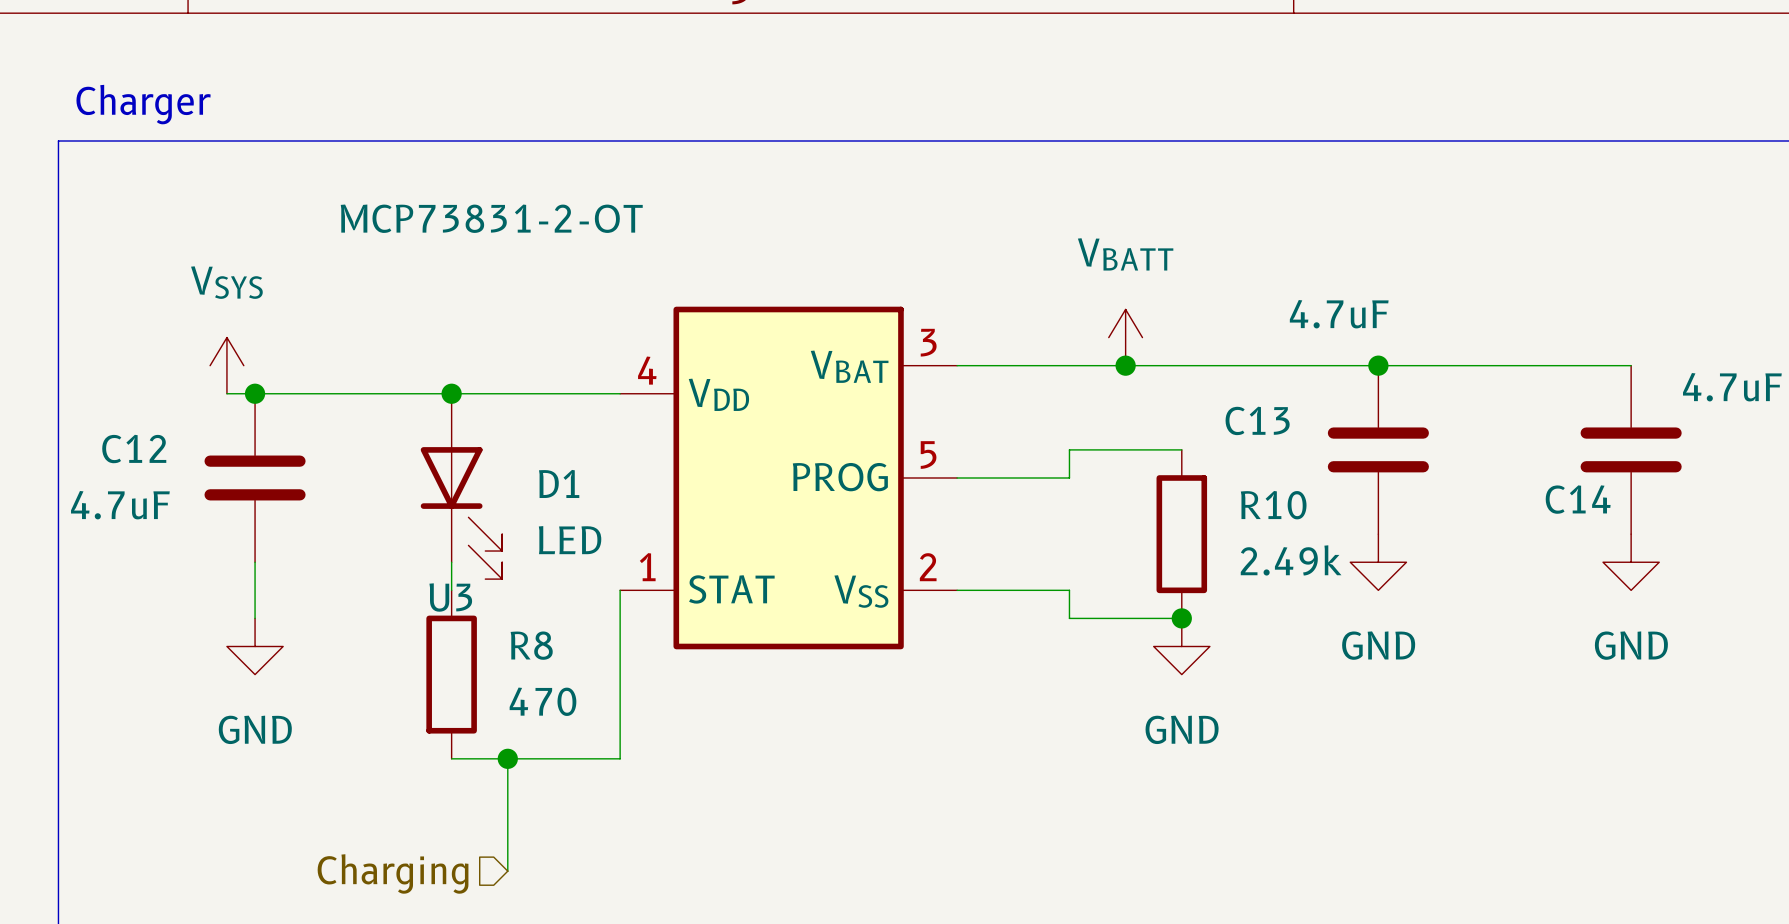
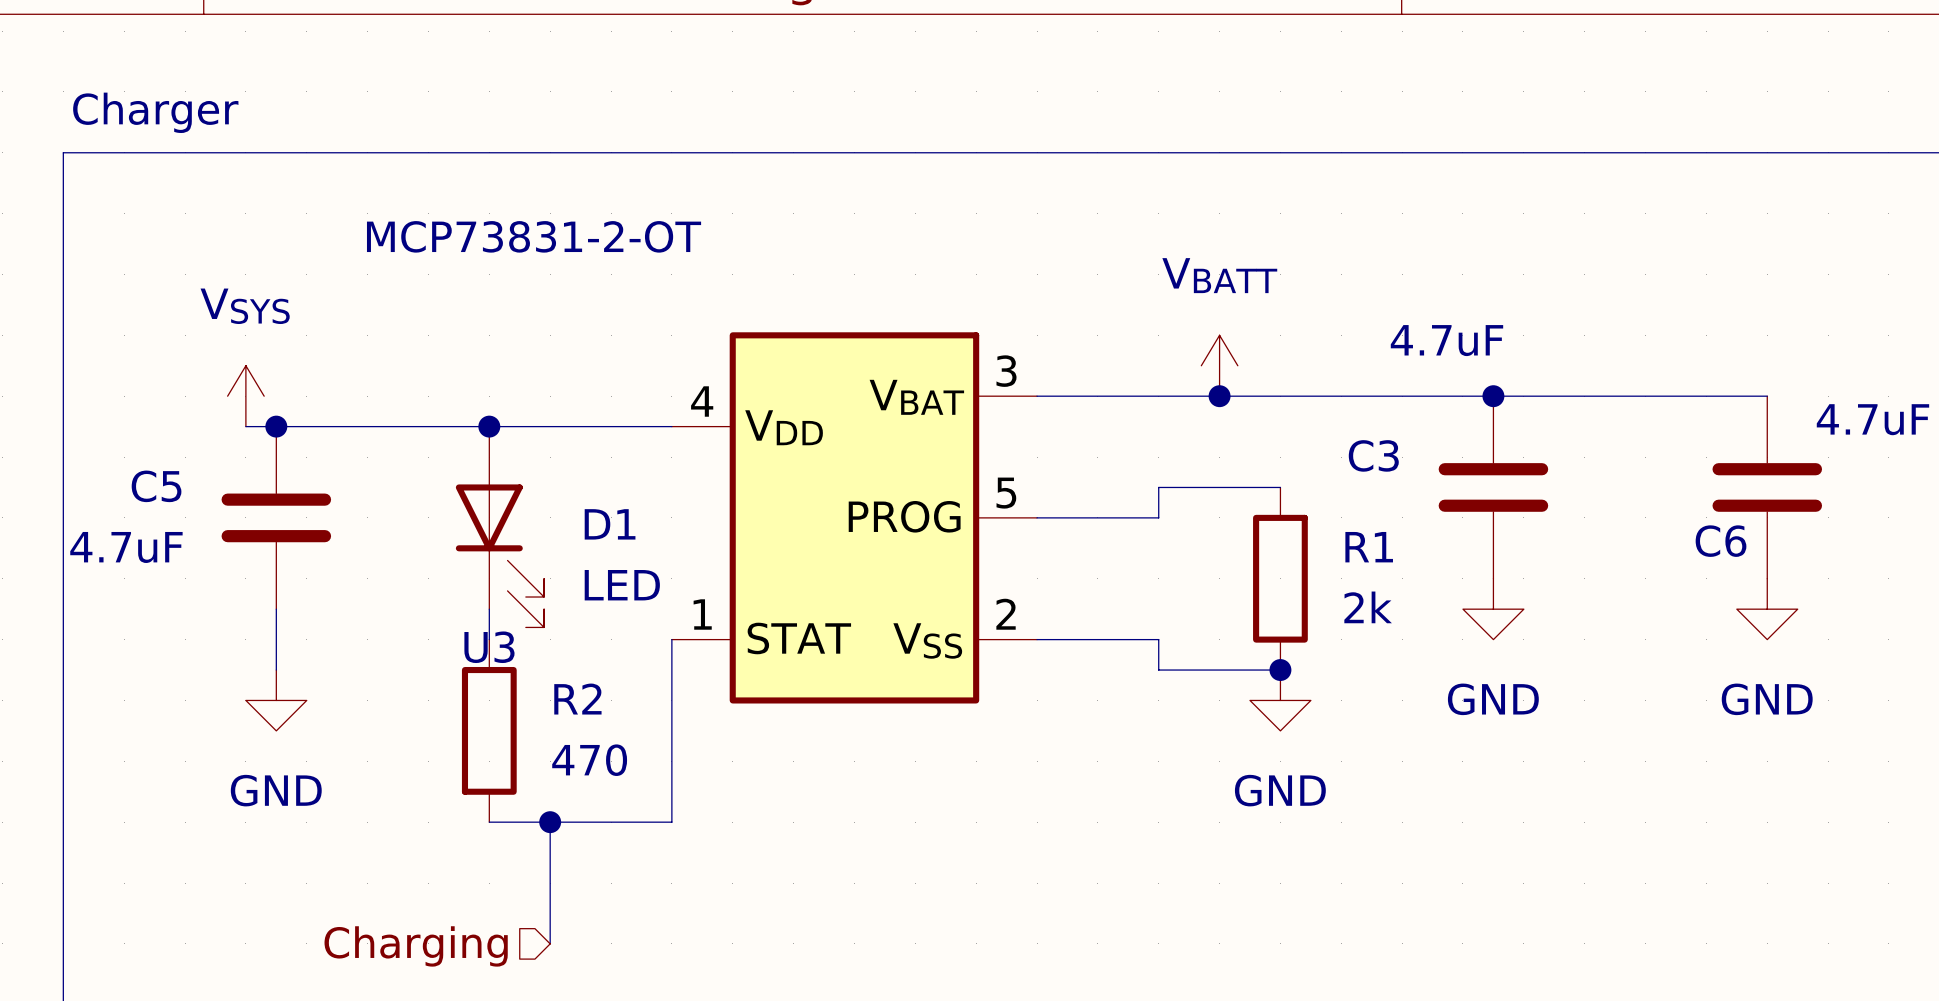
C13 name: C13 (1257, 420) -> C3 (1373, 455)
C12 name: C12 (134, 449) -> C5 (156, 486)
C14 name: C14 (1578, 499) -> C6 (1721, 541)
R10 name: R10 (1273, 505) -> R1 (1369, 547)
R10 value: 2.49k (1291, 560) -> 2k (1368, 607)
R8 name: R8 (531, 645) -> R2 (577, 699)

